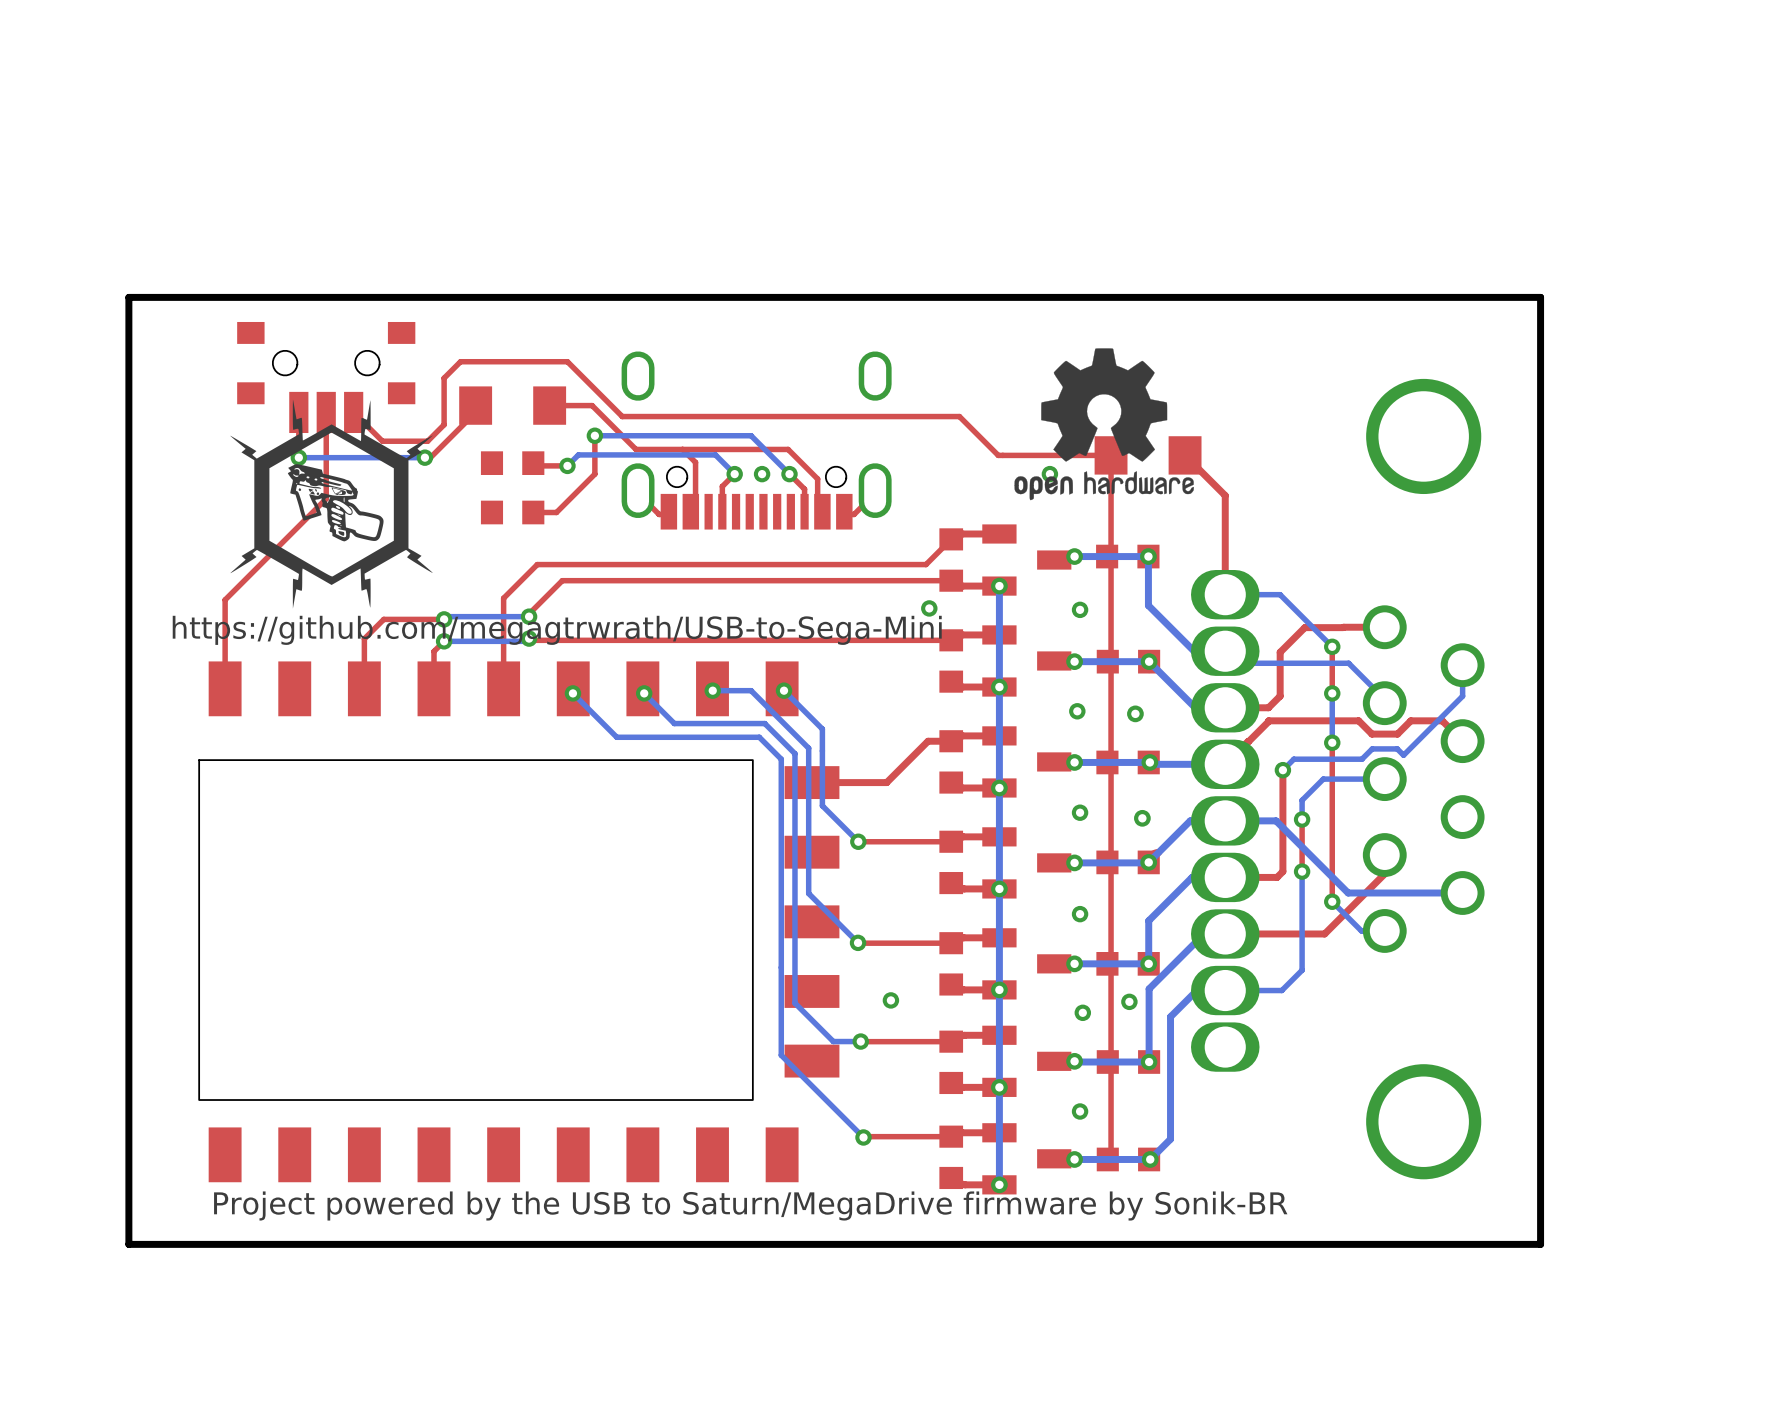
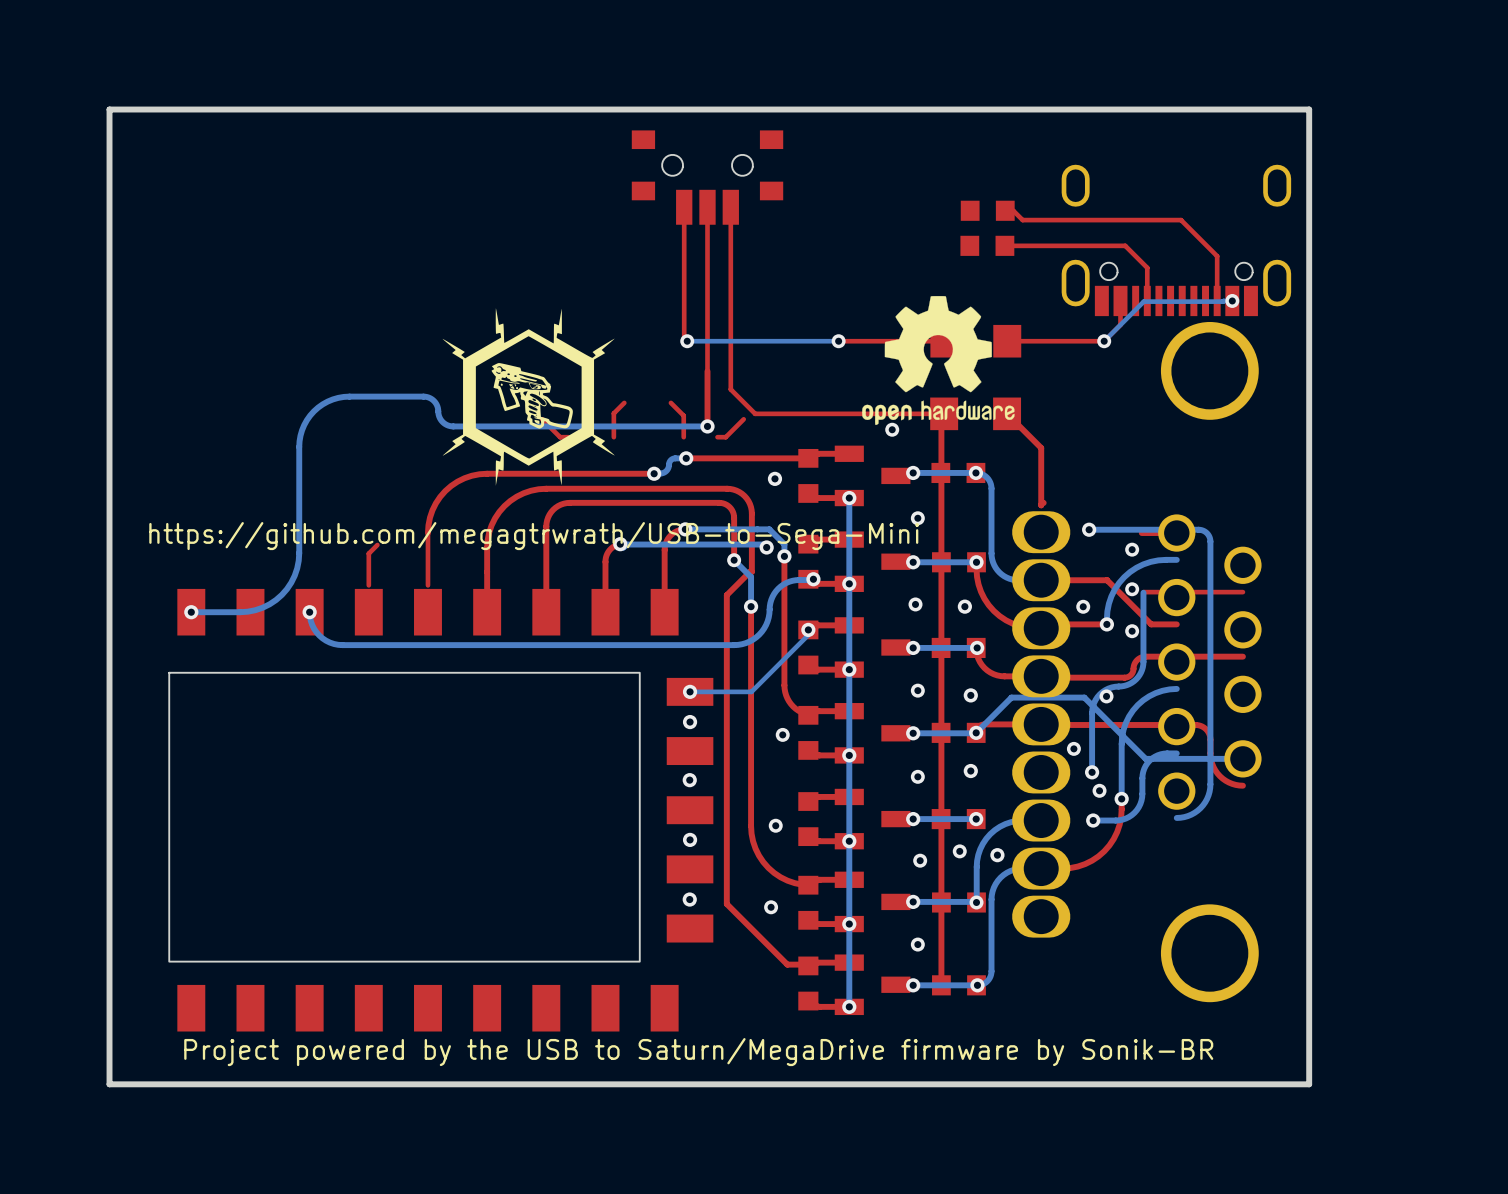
top track: none -> (684, 207) (684, 338) (687, 341)
top track: none -> (707, 207) (707, 426)
top track: none -> (730, 207) (730, 389) (755, 413) (944, 413)
part: none -> (987, 210)
top track: none -> (1005, 210) (1013, 210) (1022, 220) (1181, 220) (1217, 256) (1217, 300)
part: none -> (987, 245)
top track: none -> (1004, 245) (1125, 245) (1147, 267) (1147, 300)
board edge: (1540, 297) (128, 297) -> (1309, 252) (1309, 109) (109, 109) (109, 252)
top track: none -> (1120, 300) (1120, 324) (1104, 341) (1007, 341)
bottom track: none -> (1232, 300) (1143, 301) (1104, 341)
via: none -> (1232, 300)
part position: (326, 377) -> (707, 177)
top track: (326, 396) (326, 498) (225, 599) (225, 688) -> none
via: none -> (687, 341)
bottom track: none -> (838, 341) (687, 341)
via: none -> (838, 341)
top track: none -> (944, 341) (838, 341)
part: none -> (975, 341)
via: none -> (1104, 341)
top track: (468, 405) (475, 405) (475, 412) (430, 457) (424, 457) -> none
part: (512, 405) -> none
top track: (549, 405) (592, 405) (635, 449) (788, 449) (817, 478) (817, 509) (822, 514) -> none
top track: (353, 412) (382, 441) (427, 441) (444, 424) (444, 378) (460, 361) (567, 361) (622, 416) (959, 416) (998, 455) (1111, 455) (1111, 1156) (1107, 1159) -> (942, 402) (941, 985)
top track: (594, 435) (594, 474) (556, 512) (533, 512) -> none
bottom track: (594, 435) (751, 435) (789, 474) -> none
via: (594, 435) -> none
part position: (756, 440) -> (1176, 240)
top track: (682, 449) (695, 462) (695, 506) (690, 511) -> none
part: (1148, 455) -> none
top track: (1185, 455) (1225, 495) (1225, 527) -> (1007, 413) (1041, 448)
via: (298, 457) -> none
bottom track: (424, 457) (298, 457) -> none
via: (424, 457) -> none
part: (512, 463) -> none
top track: (533, 463) (536, 465) (567, 465) -> none
bottom track: (567, 465) (578, 454) (715, 454) (734, 474) -> none
via: (567, 465) -> none
via: (734, 474) -> none
via: (762, 474) -> none
via: (789, 474) -> none
via position: (1049, 474) -> (892, 429)
part: none -> (975, 413)
bottom track: none -> (707, 426) (451, 426) (441, 420) (436, 403) (426, 396) (349, 396) (332, 399) (318, 407) (310, 415) (300, 435) (299, 553) (297, 568) (291, 582) (276, 599) (255, 610) (240, 612) (191, 612)
via: none -> (707, 426)
drawing position: (331, 504) -> (528, 397)
part: (512, 512) -> none
bottom track: none -> (686, 458) (672, 458) (665, 471) (654, 473)
via: none -> (686, 458)
top track: (951, 539) (926, 564) (537, 564) (503, 598) (503, 627) -> (654, 473) (487, 473) (471, 475) (451, 485) (440, 496) (432, 510) (427, 532)
top track: none -> (813, 458) (686, 458)
bottom track: (1148, 556) (1148, 605) (1194, 651) (1225, 651) (1237, 663) (1348, 663) (1384, 699) (1384, 703) -> (975, 472) (985, 476) (990, 484) (991, 553) (995, 567) (1001, 574) (1012, 579) (1041, 580)
via: none -> (654, 473)
via: none -> (774, 478)
top track: (951, 580) (562, 580) (529, 613) (529, 616) -> none
bottom track: (1225, 594) (1280, 594) (1332, 646) -> none
via: (929, 608) -> none
bottom track: (529, 616) (446, 616) (444, 619) -> none
via: (529, 616) -> none
top track: (444, 619) (383, 619) (364, 638) (364, 688) -> none
via: (444, 619) -> none
top track: none -> (685, 529) (672, 533) (665, 545) (664, 612)
bottom track: none -> (685, 529) (769, 529) (784, 544) (784, 556)
via: none -> (685, 529)
bottom track: none -> (1089, 529) (1200, 529) (1205, 532) (1210, 538) (1210, 788) (1207, 798) (1197, 810) (1187, 816) (1176, 817)
via: none -> (1089, 529)
top track: (1343, 627) (1304, 627) (1280, 652) (1280, 696) (1268, 707) (1218, 707) -> none
top track: (529, 638) (530, 640) (951, 640) -> none
bottom track: (529, 638) (526, 641) (444, 641) -> none
via: (529, 638) -> none
top track: none -> (620, 544) (610, 548) (605, 557) (605, 612)
bottom track: none -> (620, 544) (623, 547) (626, 544) (763, 544) (766, 547)
via: none -> (620, 544)
via: (444, 641) -> none
via: none -> (766, 547)
top track: (1332, 646) (1332, 693) -> none
top track: none -> (784, 556) (785, 692) (789, 701) (795, 708) (804, 713) (814, 715)
via: none -> (784, 556)
bottom track: none -> (1176, 559) (1150, 561) (1136, 567) (1124, 577) (1111, 596) (1107, 611) (1106, 624)
top track: none -> (734, 560) (734, 515) (731, 508) (723, 503) (563, 503) (551, 512) (546, 523) (546, 612)
bottom track: none -> (734, 560) (751, 577) (751, 606)
via: none -> (734, 560)
bottom track: (1149, 661) (1195, 707) (1225, 707) -> none
bottom track: (1462, 665) (1462, 696) (1403, 755) (1397, 748) (1372, 748) (1361, 759) (1293, 759) (1282, 770) -> none
top track: none -> (976, 569) (978, 584) (984, 598) (993, 610) (1013, 623) (1035, 628) (1041, 628) (1045, 624) (1106, 624)
via: none -> (813, 579)
bottom track: none -> (811, 580) (792, 580) (780, 586) (772, 596) (767, 621) (761, 631) (749, 641) (738, 644) (338, 644) (329, 642) (319, 635) (312, 624) (309, 612)
top track: none -> (1041, 580) (1107, 580) (1151, 624) (1176, 624)
bottom track: (712, 690) (751, 690) (808, 748) (808, 893) (858, 942) -> none
via: (712, 690) -> none
bottom track: (784, 690) (822, 729) (822, 805) (858, 841) -> none
via: (784, 690) -> none
bottom track: (572, 693) (616, 737) (759, 737) (781, 759) (781, 1055) (863, 1137) -> none
via: (572, 693) -> none
bottom track: (644, 693) (674, 723) (764, 723) (794, 753) (794, 1003) (833, 1041) (860, 1041) -> none
via: (644, 693) -> none
bottom track: (1332, 693) (1332, 742) -> none
top track: none -> (1242, 592) (1143, 592)
bottom track: none -> (1143, 592) (1142, 667) (1134, 681) (1126, 685) (1105, 690) (1094, 702) (1092, 713) (1092, 772)
top track: none -> (751, 606) (751, 826) (753, 841) (763, 862) (774, 872) (794, 883) (810, 885)
via: none -> (751, 606)
via: none -> (1083, 606)
via: none -> (191, 612)
via: none -> (309, 612)
top track: none -> (487, 612) (487, 547) (489, 532) (495, 518) (504, 506) (523, 493) (546, 488) (727, 488) (736, 490) (744, 496) (751, 510) (751, 571) (726, 595) (726, 904) (787, 964) (813, 964)
top track: (1268, 720) (1358, 720) (1371, 734) (1397, 734) (1410, 720) (1442, 720) (1462, 741) -> none
top track: (1268, 721) (1225, 764) (1226, 765) -> none
via: none -> (1106, 624)
top track: (951, 741) (928, 741) (886, 782) (812, 782) -> none
bottom track: none -> (808, 629) (808, 635) (751, 691) (690, 691)
via: none -> (808, 629)
top track: (1332, 742) (1332, 901) -> none
top track: none -> (976, 647) (980, 662) (993, 674) (1042, 677) (1126, 677) (1132, 673) (1136, 661) (1144, 656) (1242, 656)
bottom track: (1149, 762) (1151, 764) (1225, 764) -> none
top track: (1282, 770) (1282, 871) (1277, 877) (1203, 877) -> none
via: (1282, 770) -> none
bottom track: (1384, 779) (1323, 779) (1302, 800) (1302, 819) -> none
bottom track: none -> (1176, 688) (1162, 690) (1149, 696) (1137, 705) (1129, 716) (1122, 736) (1121, 798)
via: none -> (690, 691)
top track: (1302, 819) (1302, 871) -> none
part position: (1225, 820) -> (1041, 724)
via: (858, 841) -> none
top track: (951, 841) (858, 841) -> none
via: none -> (690, 722)
top track: none -> (984, 724) (1198, 725) (1204, 728) (1209, 734) (1211, 760) (1217, 773) (1228, 782) (1242, 785)
top track: (1384, 855) (1384, 873) (1324, 933) (1225, 933) -> none
via: none -> (782, 734)
bottom track: (1302, 871) (1302, 970) (1281, 990) (1225, 990) -> none
via: (1302, 871) -> none
bottom track: (1225, 877) (1192, 877) (1148, 920) (1148, 963) -> none
via: none -> (1073, 748)
bottom track: none -> (1176, 753) (1160, 754) (1147, 763) (1142, 775) (1141, 800) (1131, 815) (1119, 820) (1093, 820)
bottom track: (1332, 901) (1361, 930) (1384, 930) -> none
via: (1332, 901) -> none
via: none -> (970, 771)
via: none -> (1092, 772)
via: none -> (689, 780)
part position: (519, 921) -> (441, 810)
via: none -> (1099, 790)
bottom track: (1225, 933) (1204, 933) (1149, 988) (1149, 1062) (1074, 1061) -> (1041, 820) (1011, 822) (994, 830) (986, 838) (980, 849) (977, 860) (976, 902) (913, 901)
top track: none -> (1121, 798) (1121, 817) (1117, 832) (1109, 845) (1098, 856) (1077, 866) (1041, 868)
via: none -> (1121, 798)
via: (858, 942) -> none
top track: (951, 943) (858, 943) -> none
via: none -> (1093, 820)
via: none -> (775, 825)
via: none -> (690, 839)
bottom track: (1231, 990) (1196, 990) (1170, 1016) (1170, 1139) (1150, 1159) -> (1041, 868) (1010, 870) (1000, 877) (995, 884) (991, 899) (991, 973) (987, 981) (977, 985)
via: (890, 1000) -> none
via: none -> (997, 855)
via: (860, 1041) -> none
top track: (951, 1041) (860, 1041) -> none
via: none -> (689, 899)
via: none -> (771, 907)
top track: (951, 1136) (863, 1137) -> none
via: (863, 1137) -> none
text position: Project powered by the USB to Saturn/MegaDrive firmware by Sonik-BR (750, 1205) -> Project powered by the USB to Saturn/MegaDrive firmware by Sonik-BR (698, 1052)
board edge: (1540, 1244) (128, 1244) -> (1309, 1057) (1309, 1084) (109, 1084) (109, 1057)

